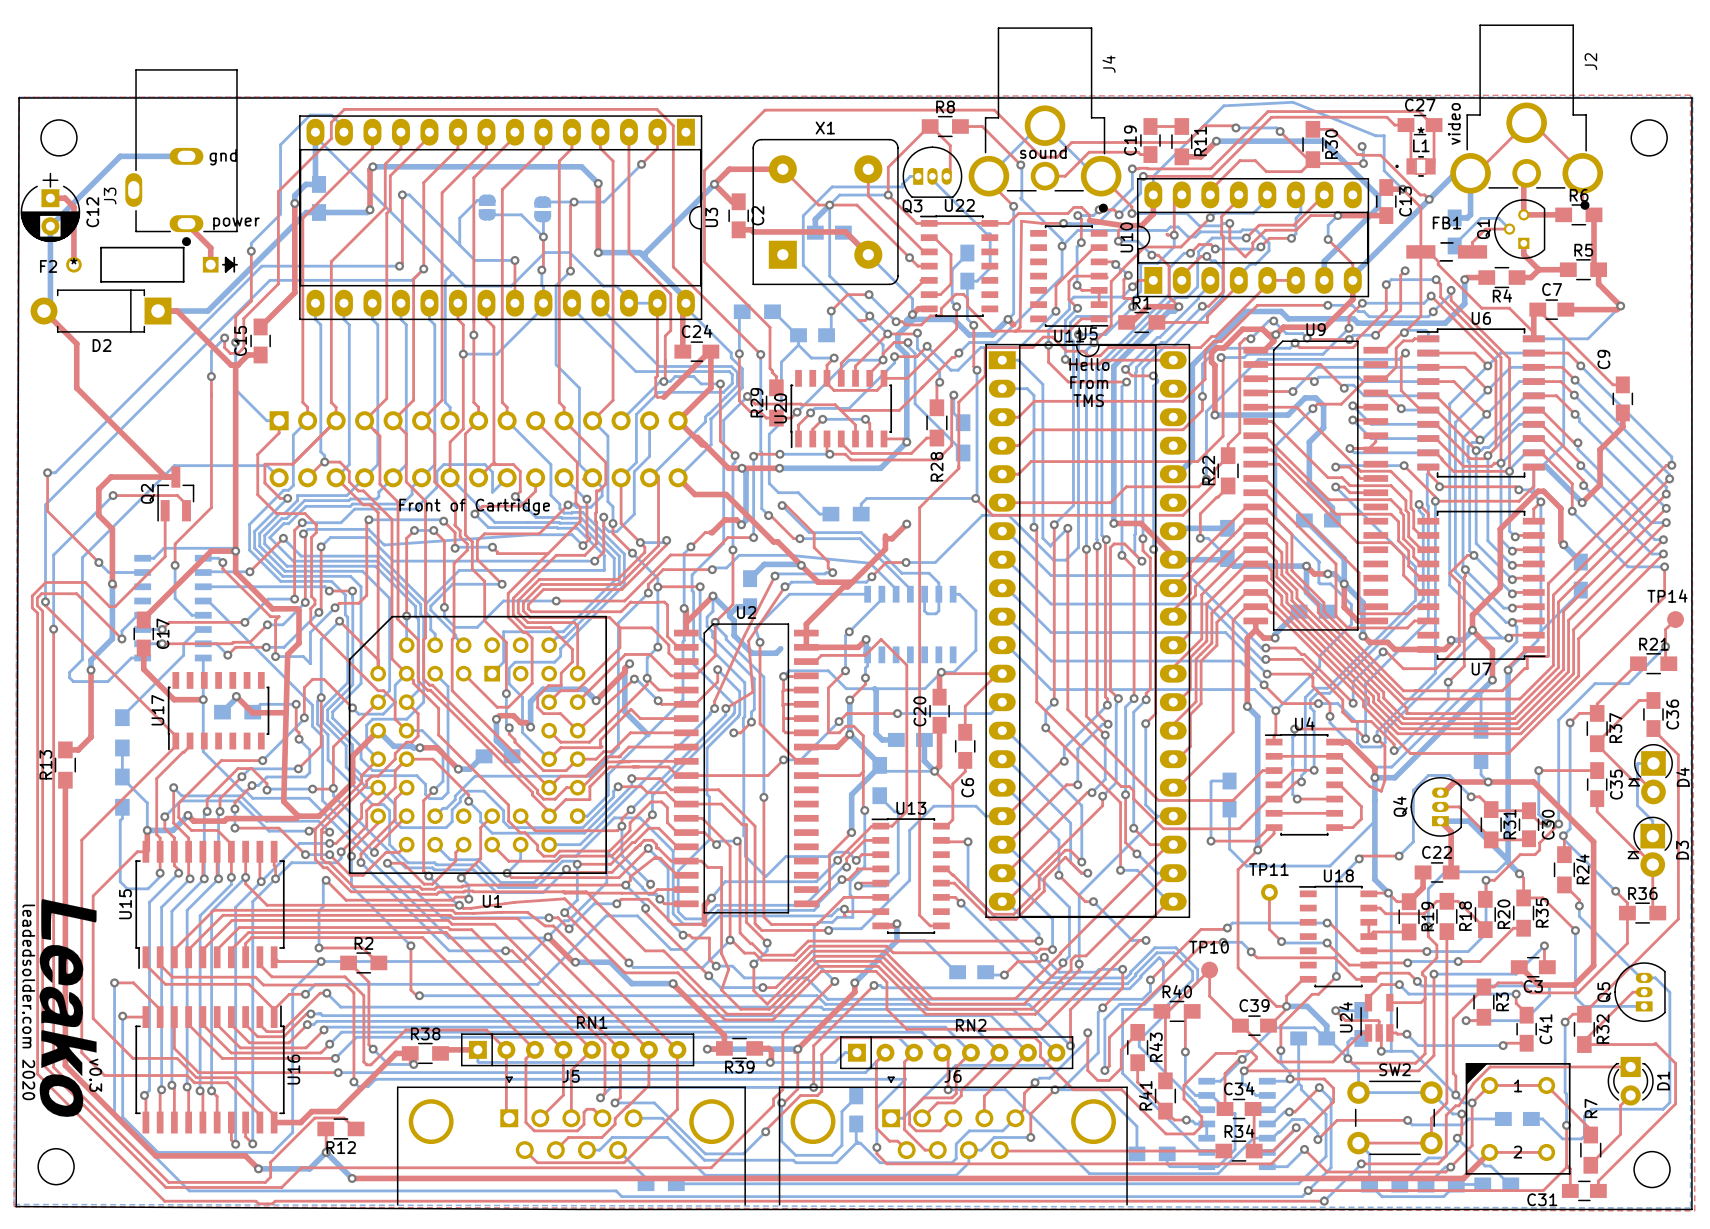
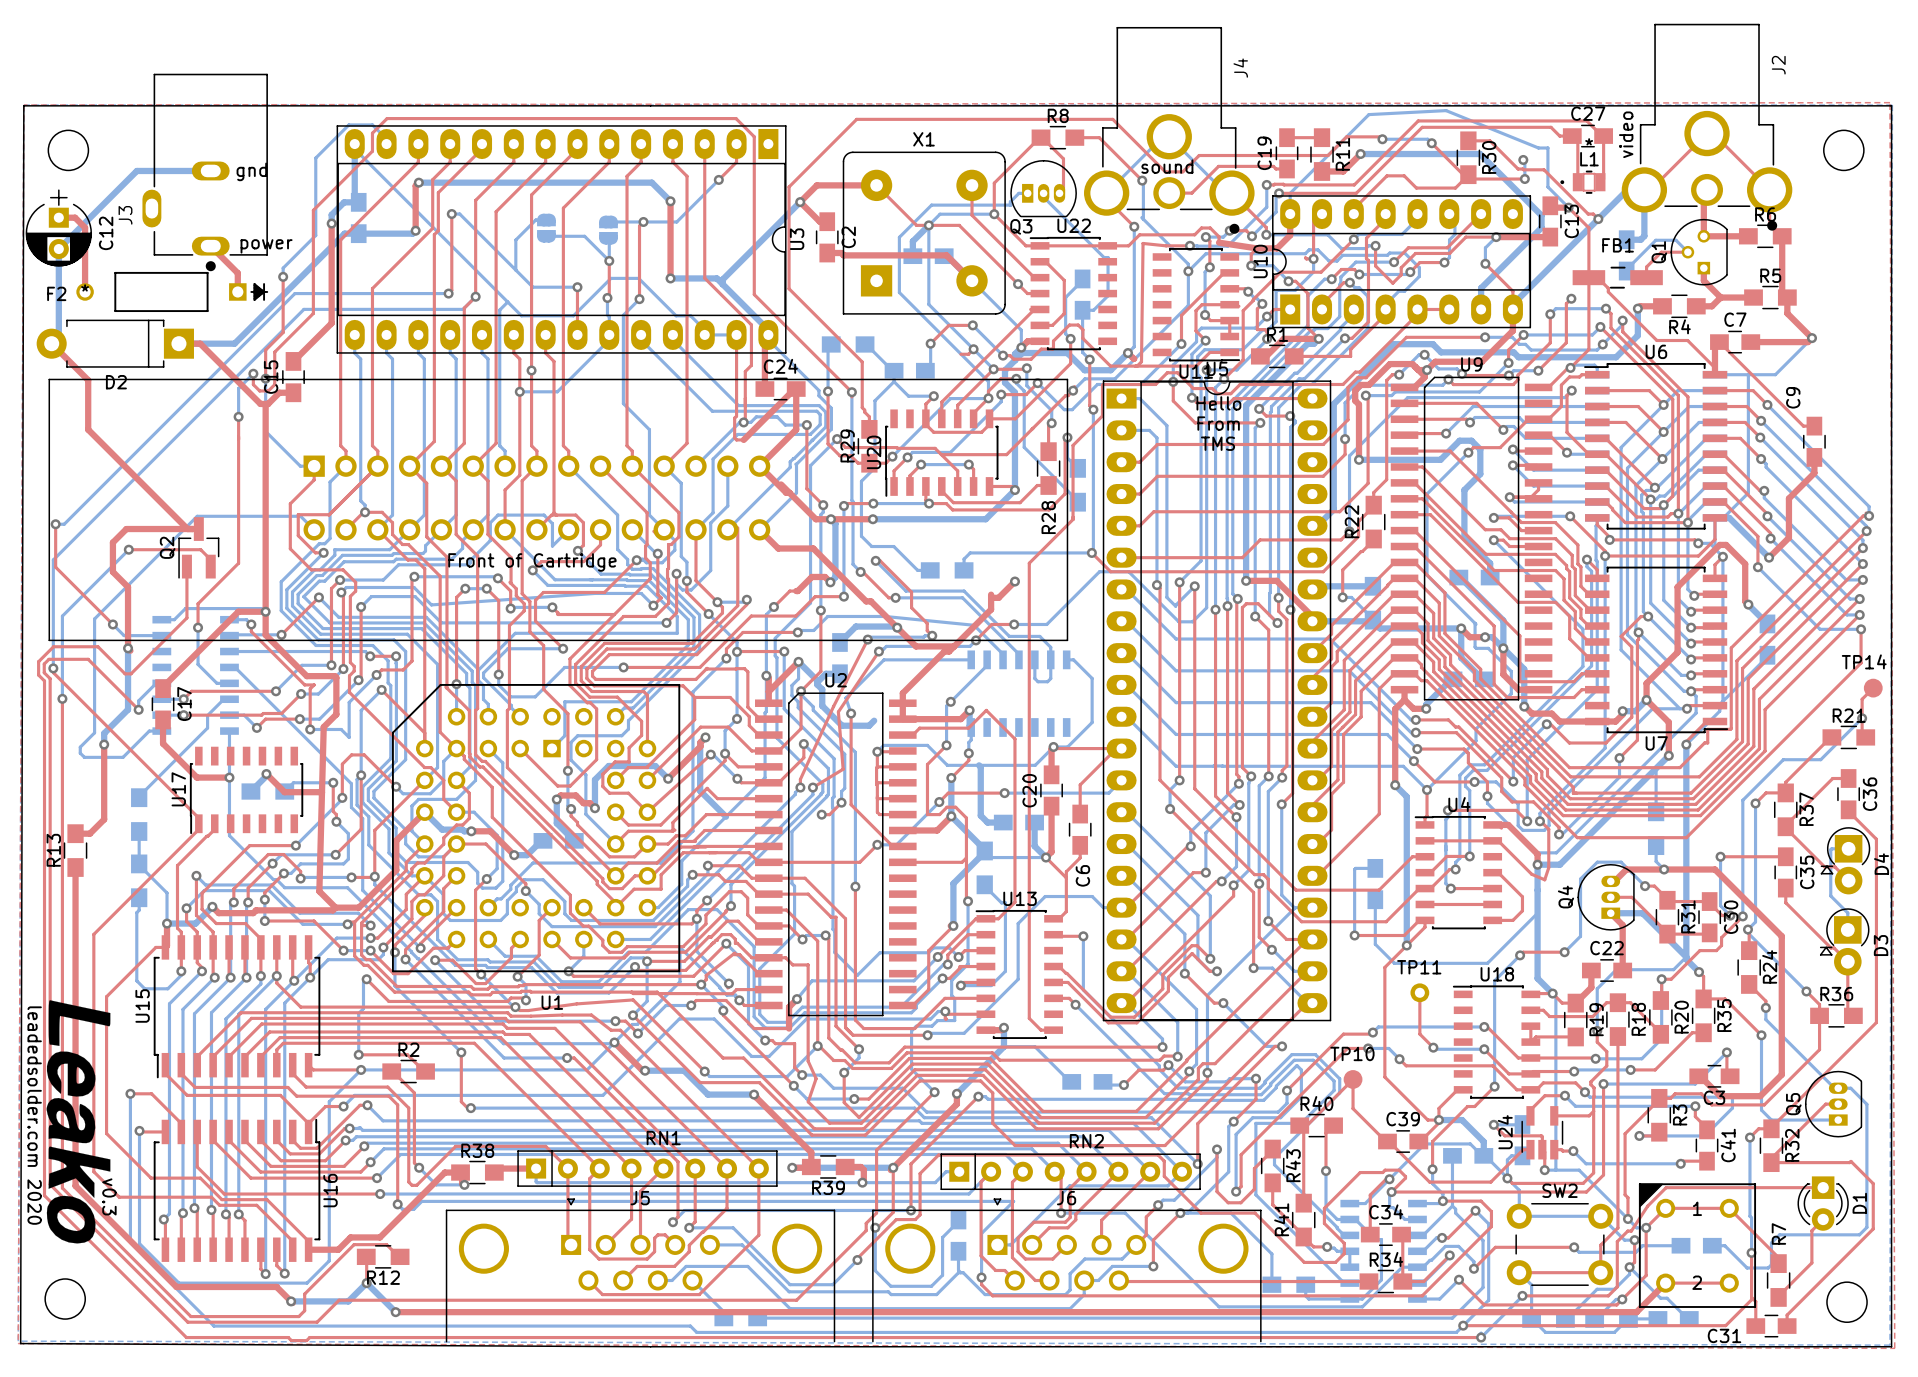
line: none -> (49, 379) (49, 640) (1067, 640) (1067, 379) (49, 379)

